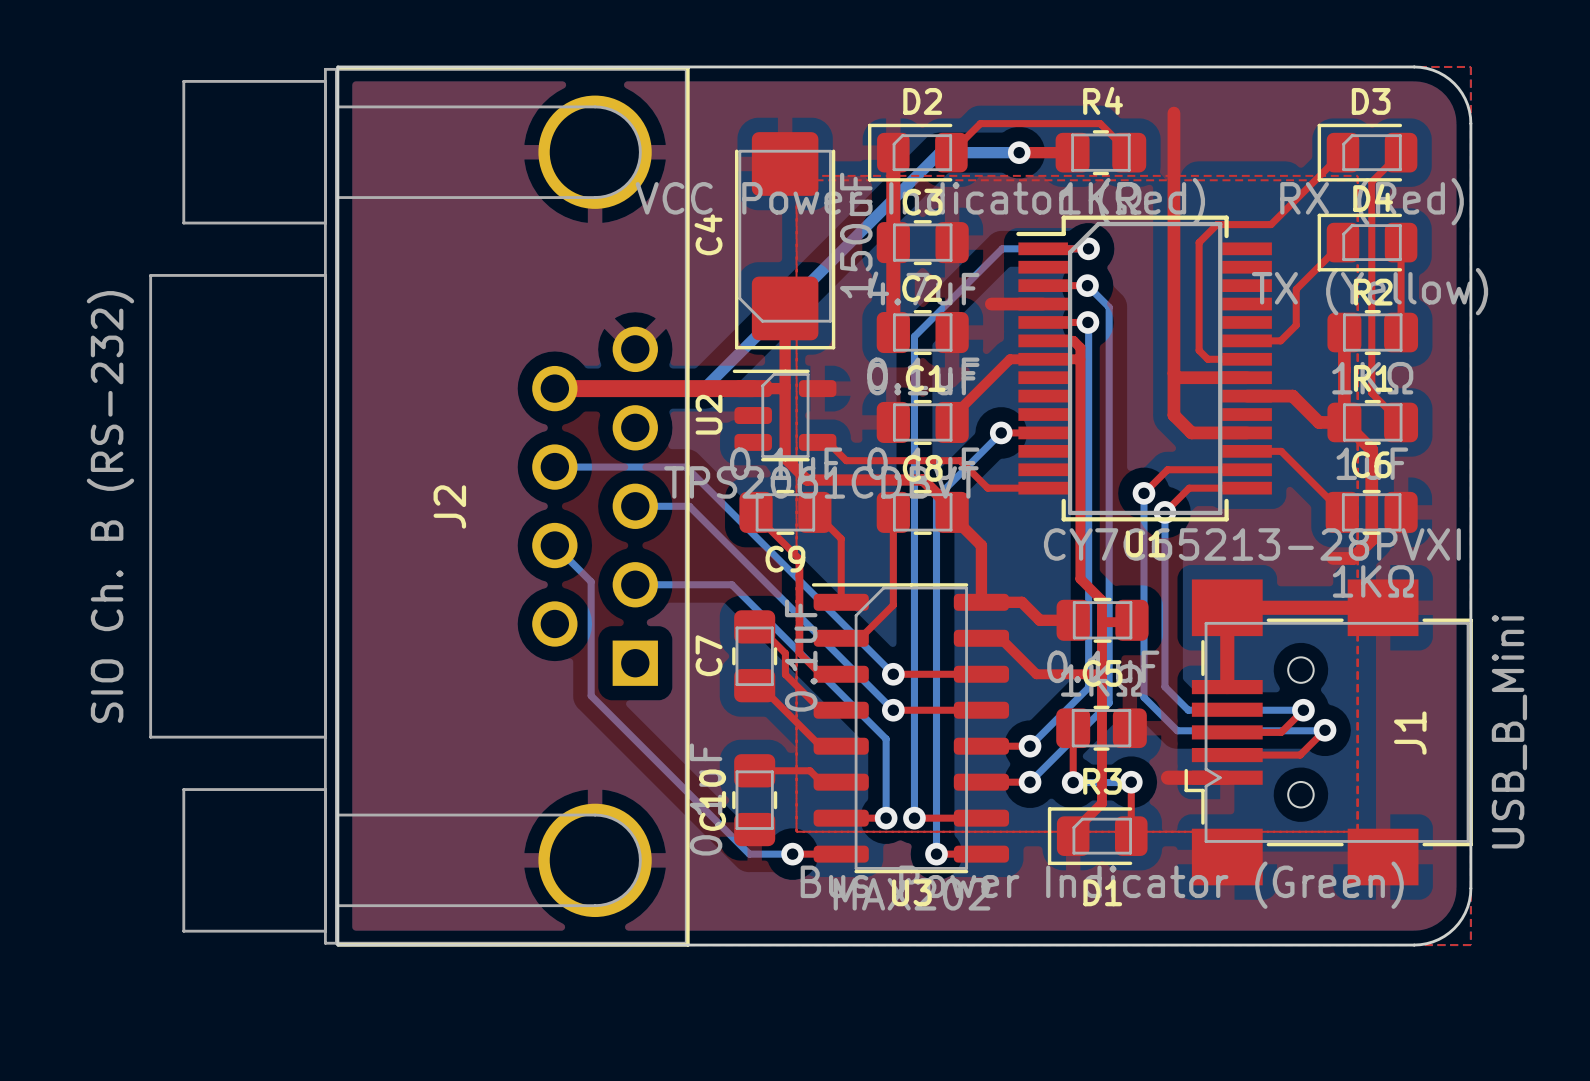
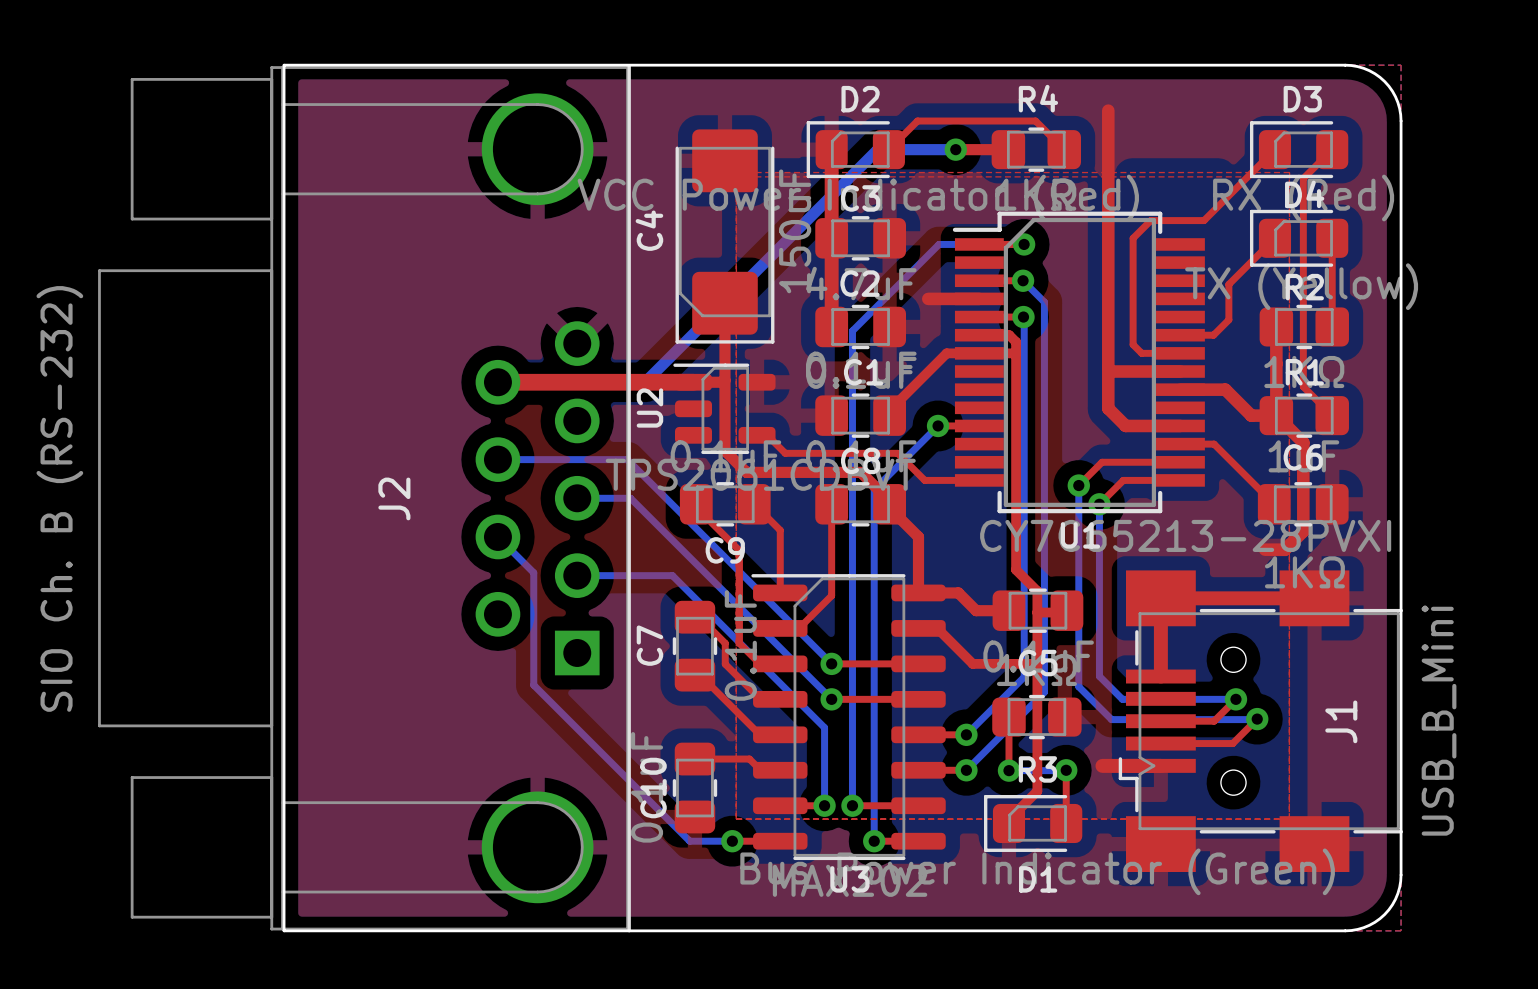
J2 footprint: [149, 65, 690, 947] -> [98, 64, 631, 933]
J1 footprint: [1184, 579, 1473, 886] -> [1118, 570, 1404, 873]

